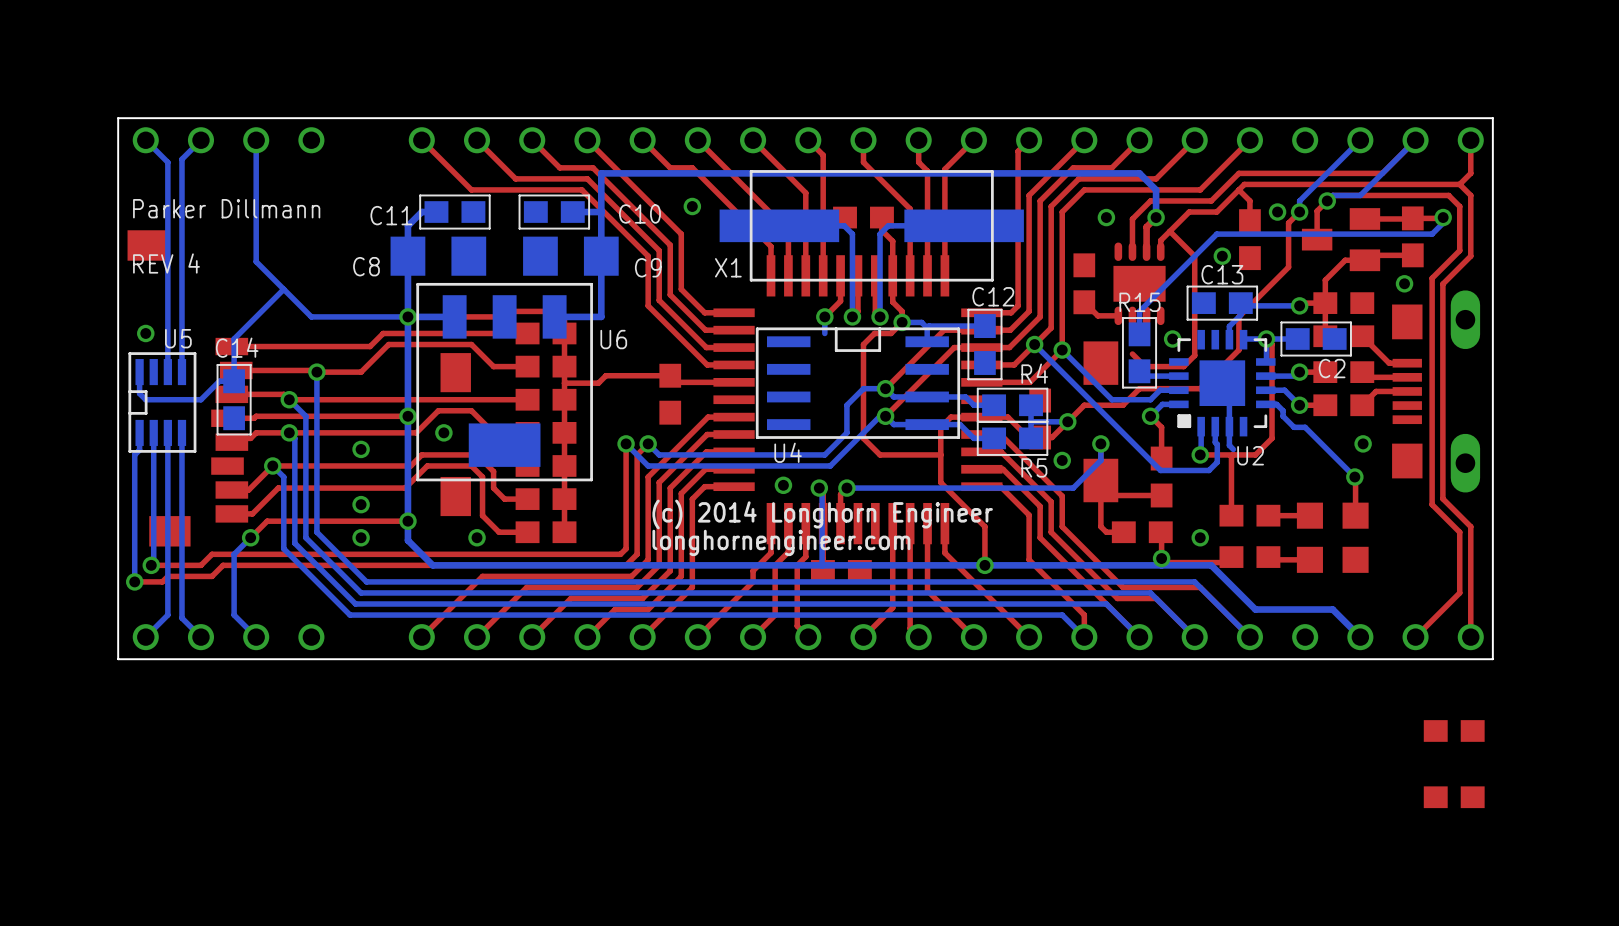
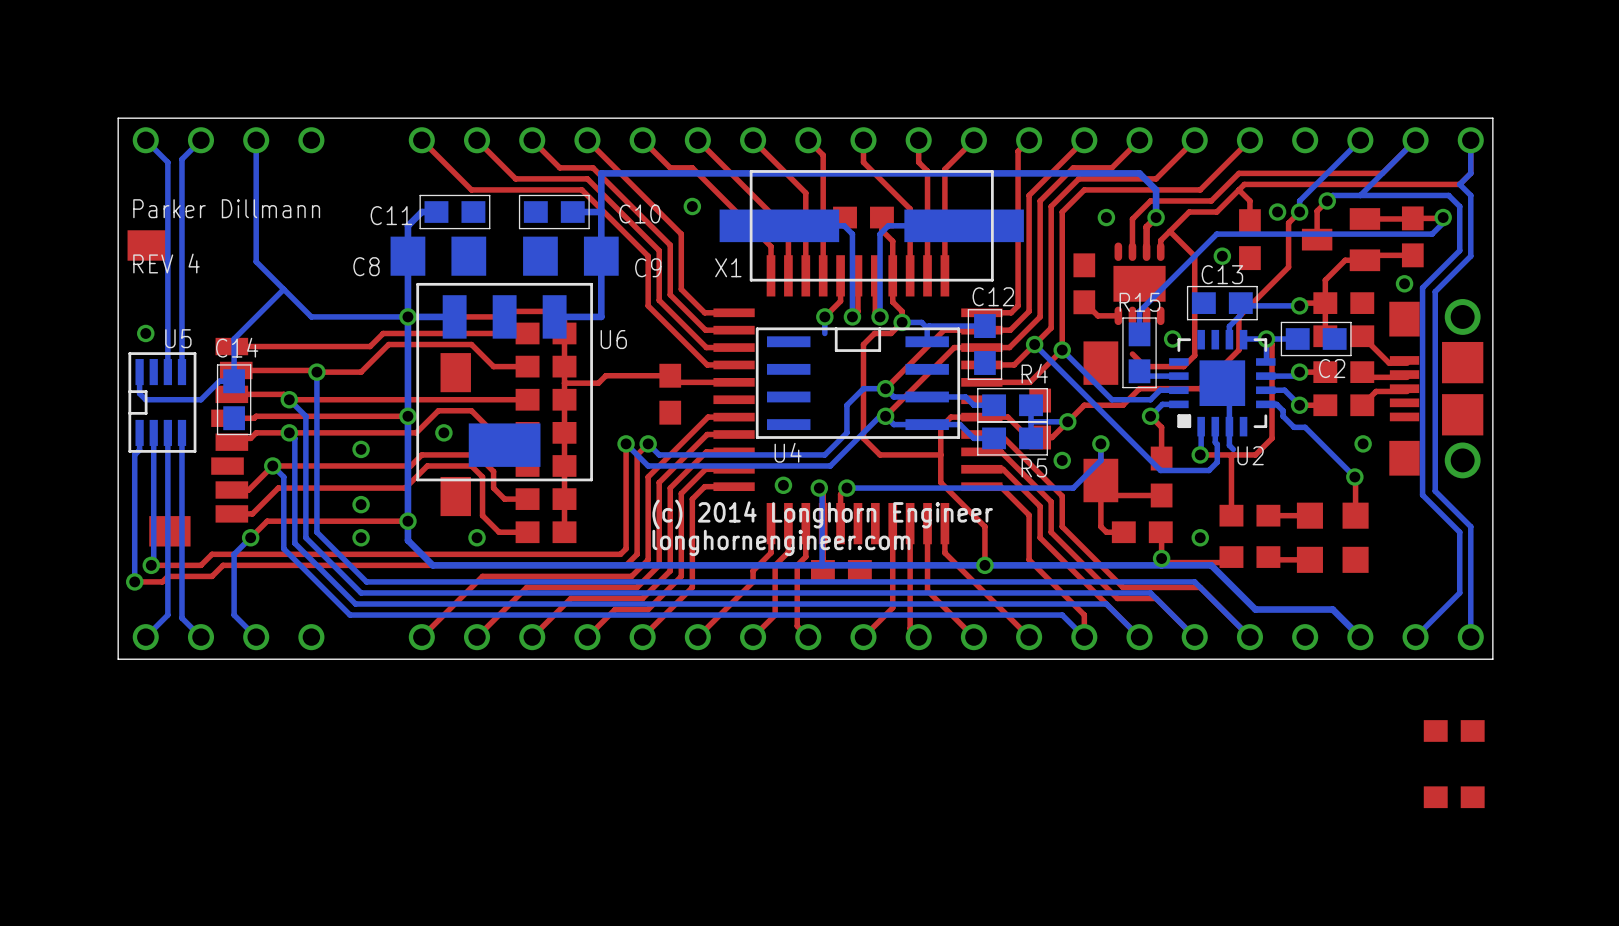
bottom track: none -> (1470, 140) (1470, 173) (1459, 184) (1470, 195) (1470, 256) (1435, 291) (1435, 491) (1470, 526) (1470, 637)
top track: (1459, 184) (1470, 195) (1470, 256) (1442, 284) (1442, 498) (1470, 526) (1470, 637) -> none
bottom track: none -> (1360, 195) (1448, 195) (1459, 206) (1459, 250) (1422, 287) (1422, 495) (1459, 532) (1459, 592) (1415, 637)
top track: (1327, 200) (1332, 195) (1448, 195) (1459, 206) (1459, 250) (1432, 278) (1432, 504) (1459, 532) (1459, 592) (1415, 637) -> none
part footprint: [1392, 290, 1481, 493] -> [1389, 299, 1484, 479]

